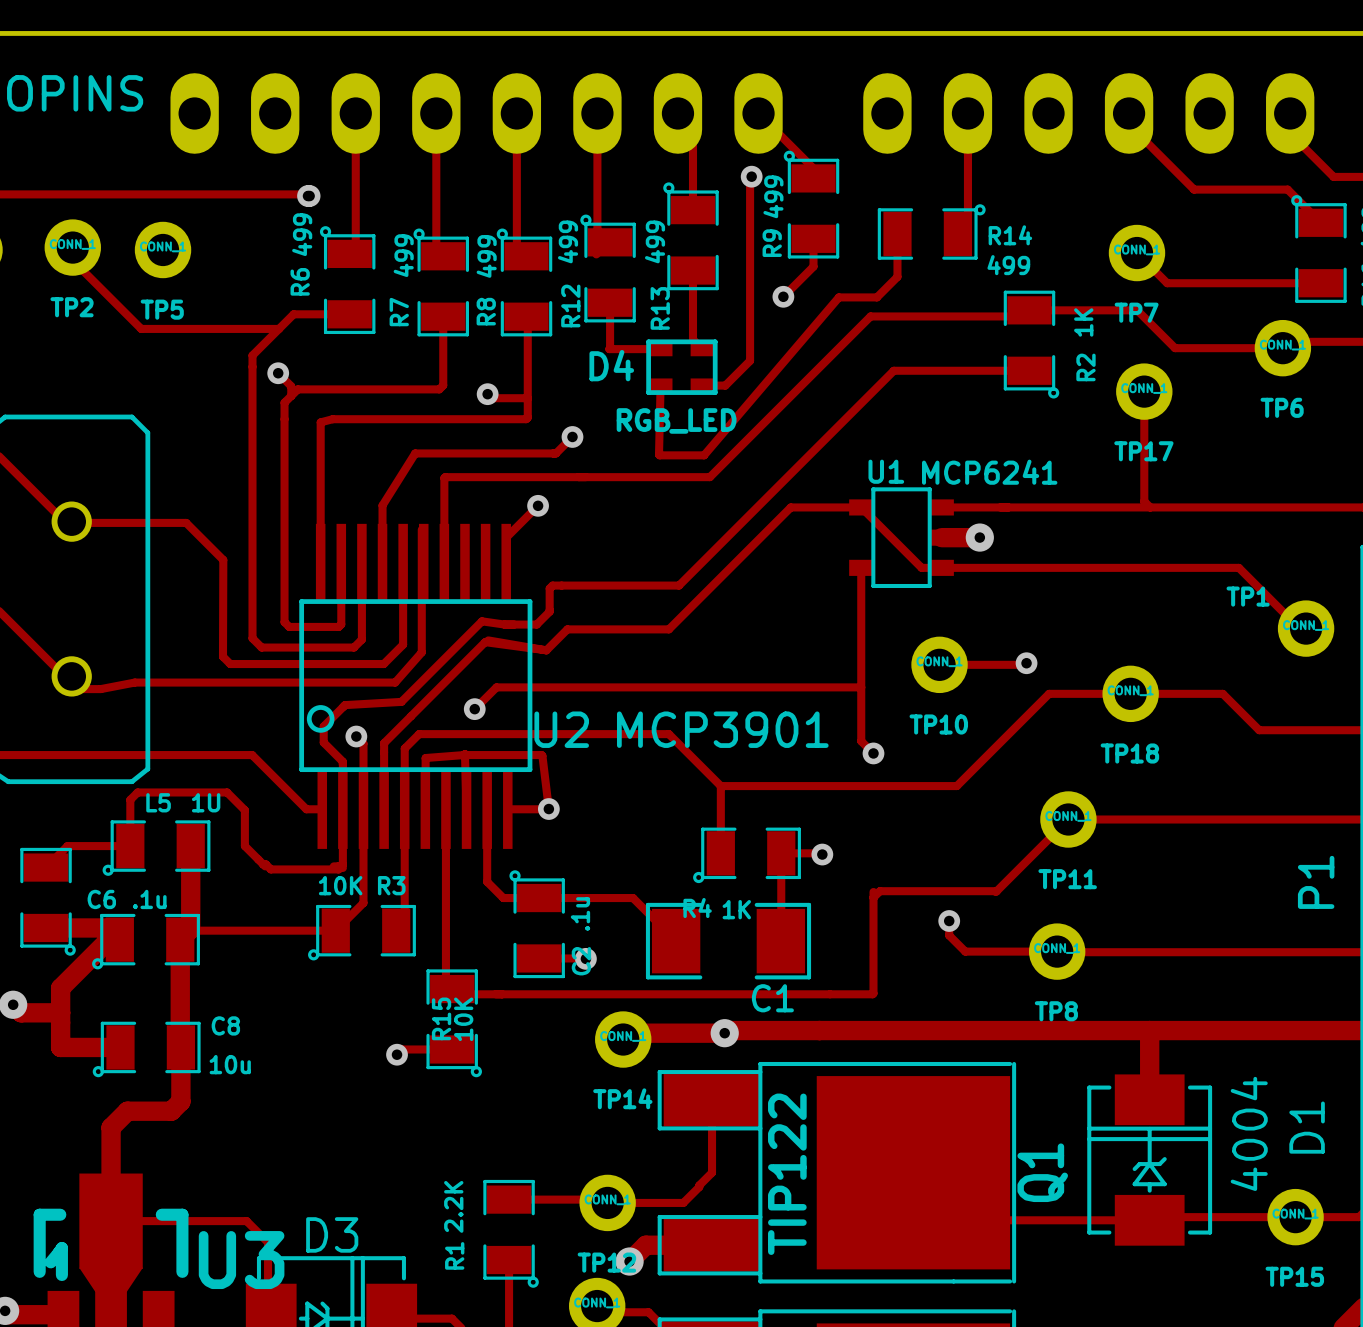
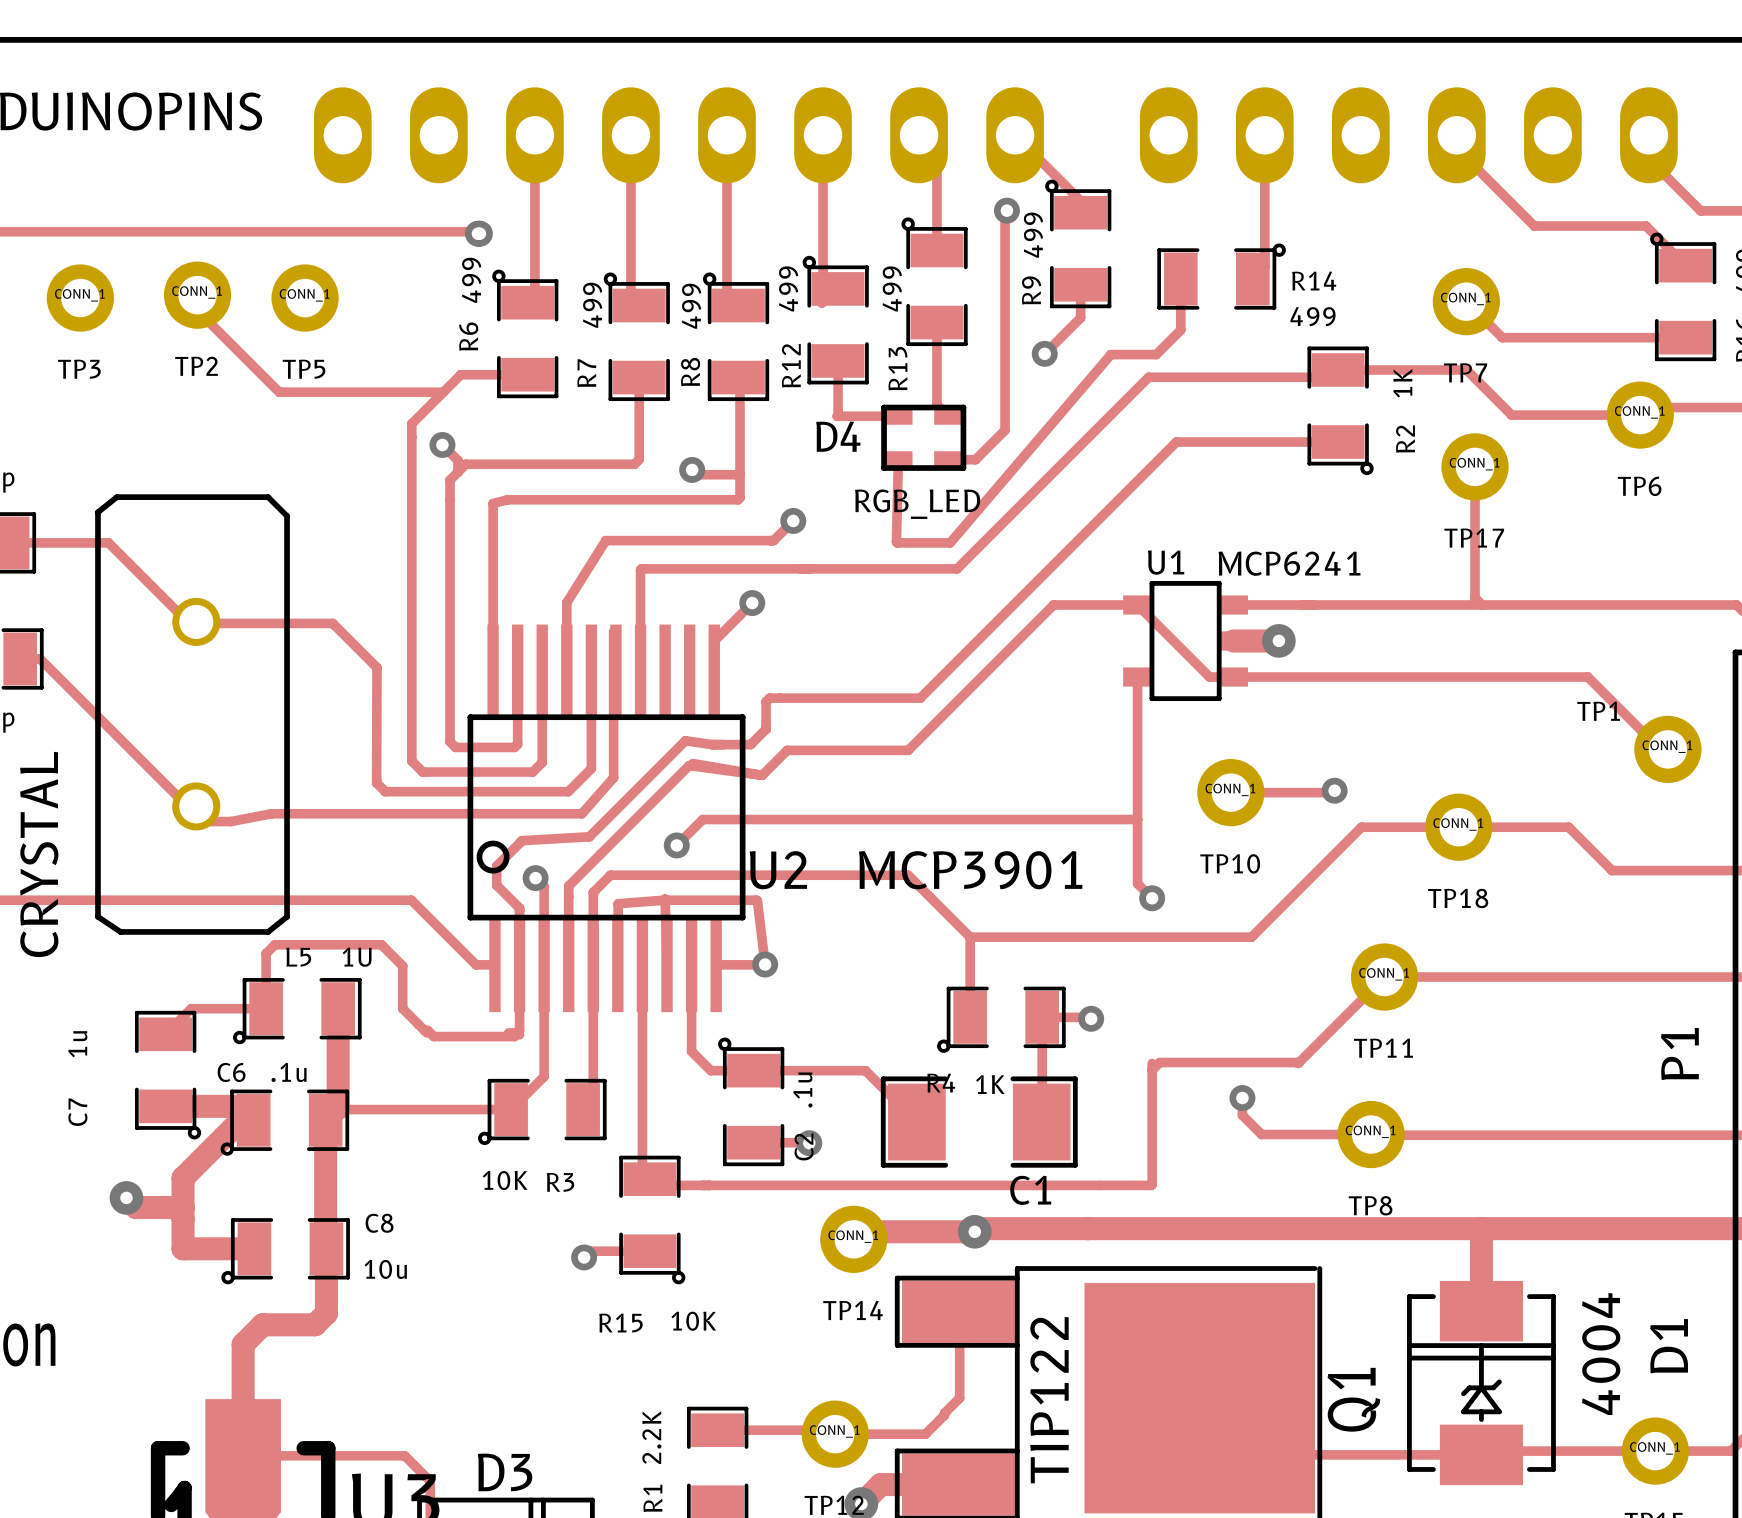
R3 value position: 10K (340, 885) -> 10K (505, 1180)
R3 name position: R3 (391, 885) -> R3 (560, 1182)
R15 name rotation: 0° (441, 1018) -> 90° clockwise (620, 1323)
R15 name position: R15 (441, 1018) -> R15 (620, 1323)
R15 value rotation: 0° (463, 1019) -> 90° clockwise (693, 1321)
R15 value position: 10K (463, 1019) -> 10K (693, 1321)

